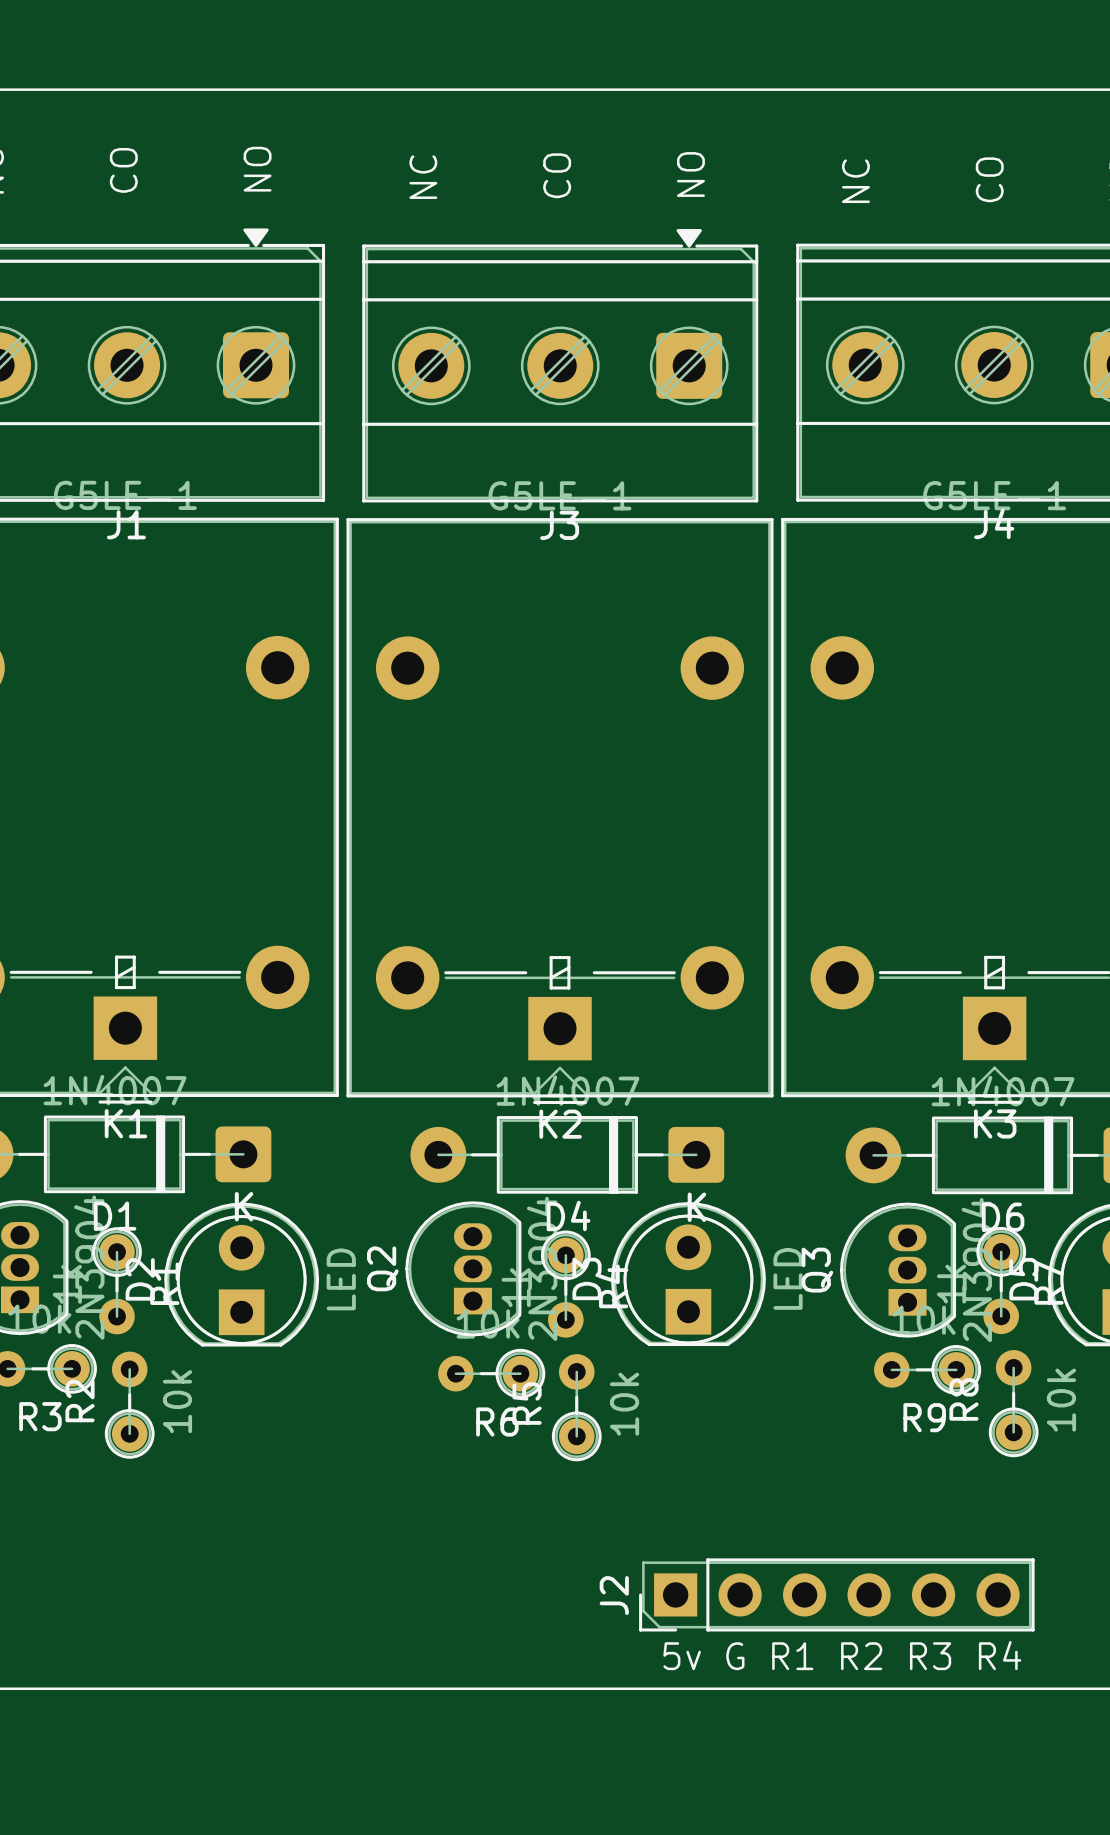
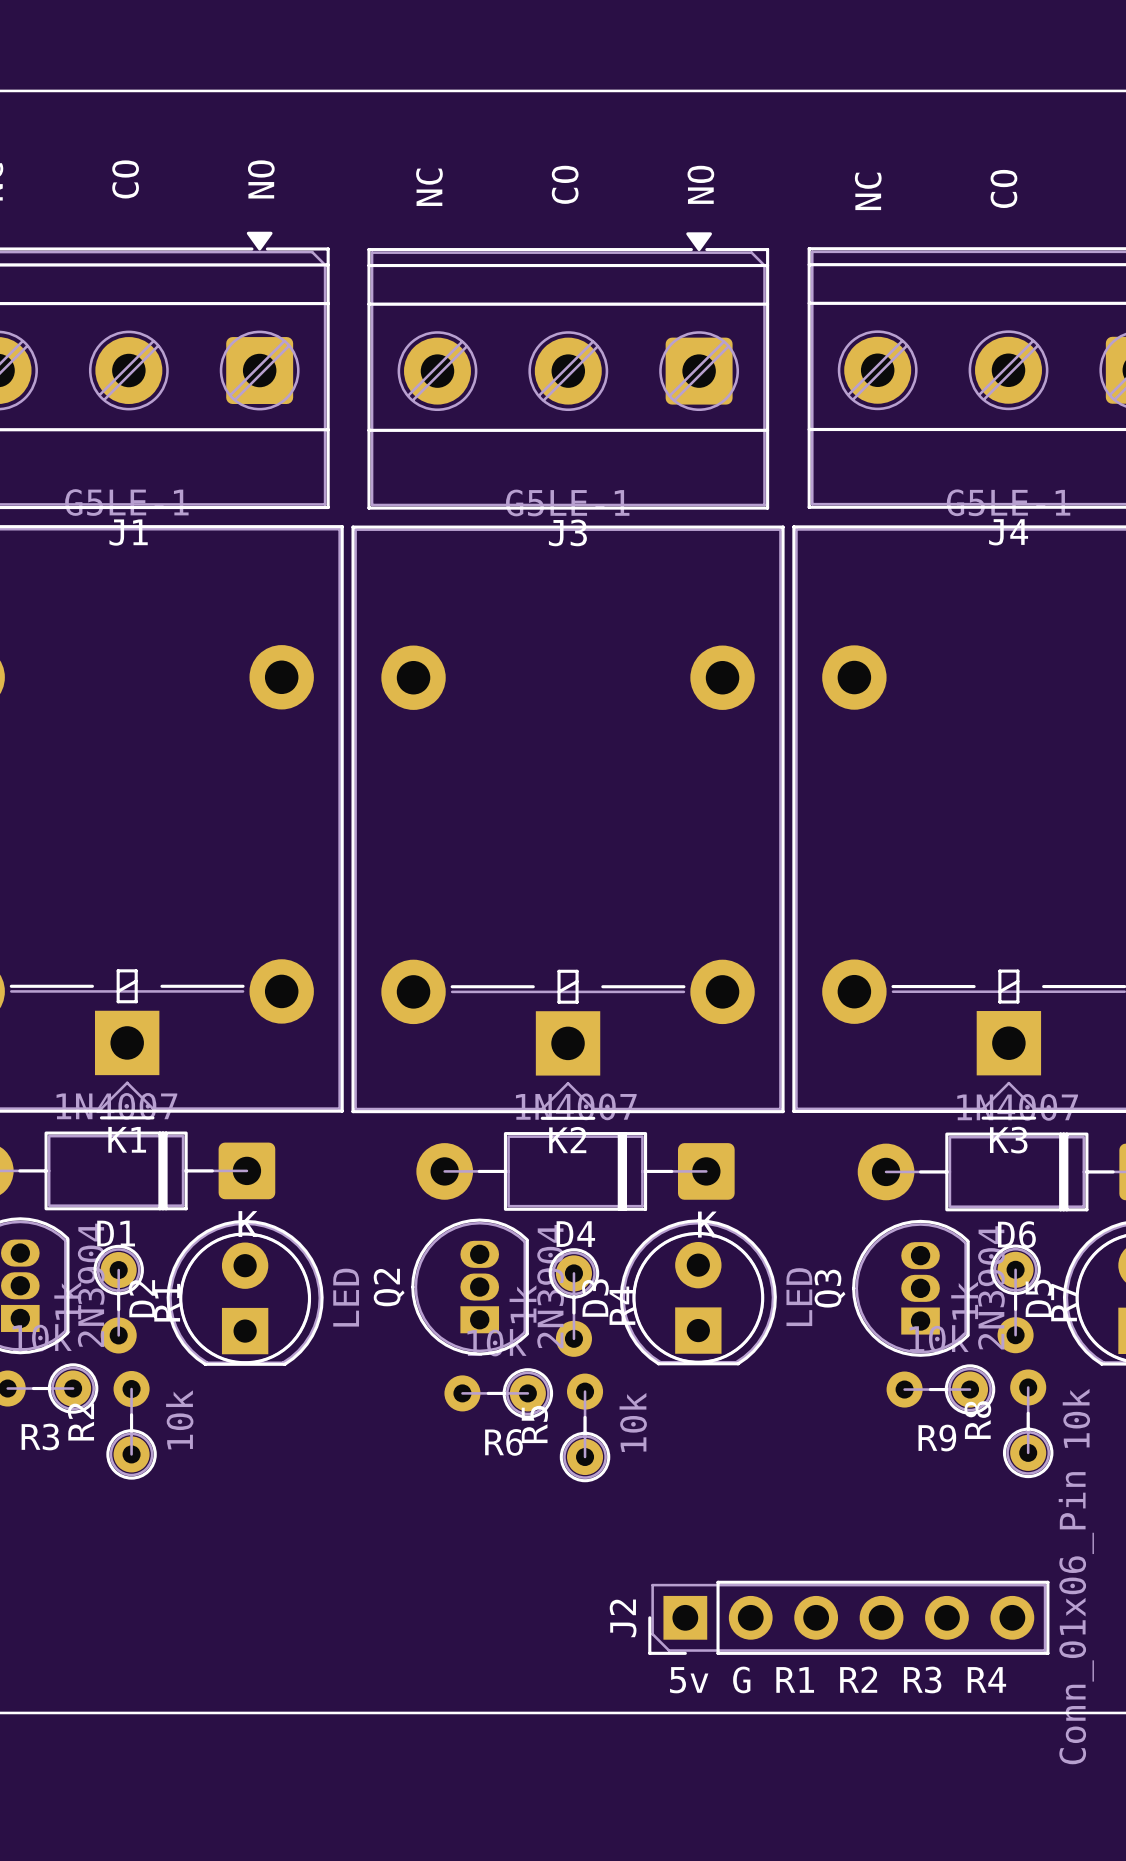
J2 value: none -> Conn_01x06_Pin (1076, 1618)

